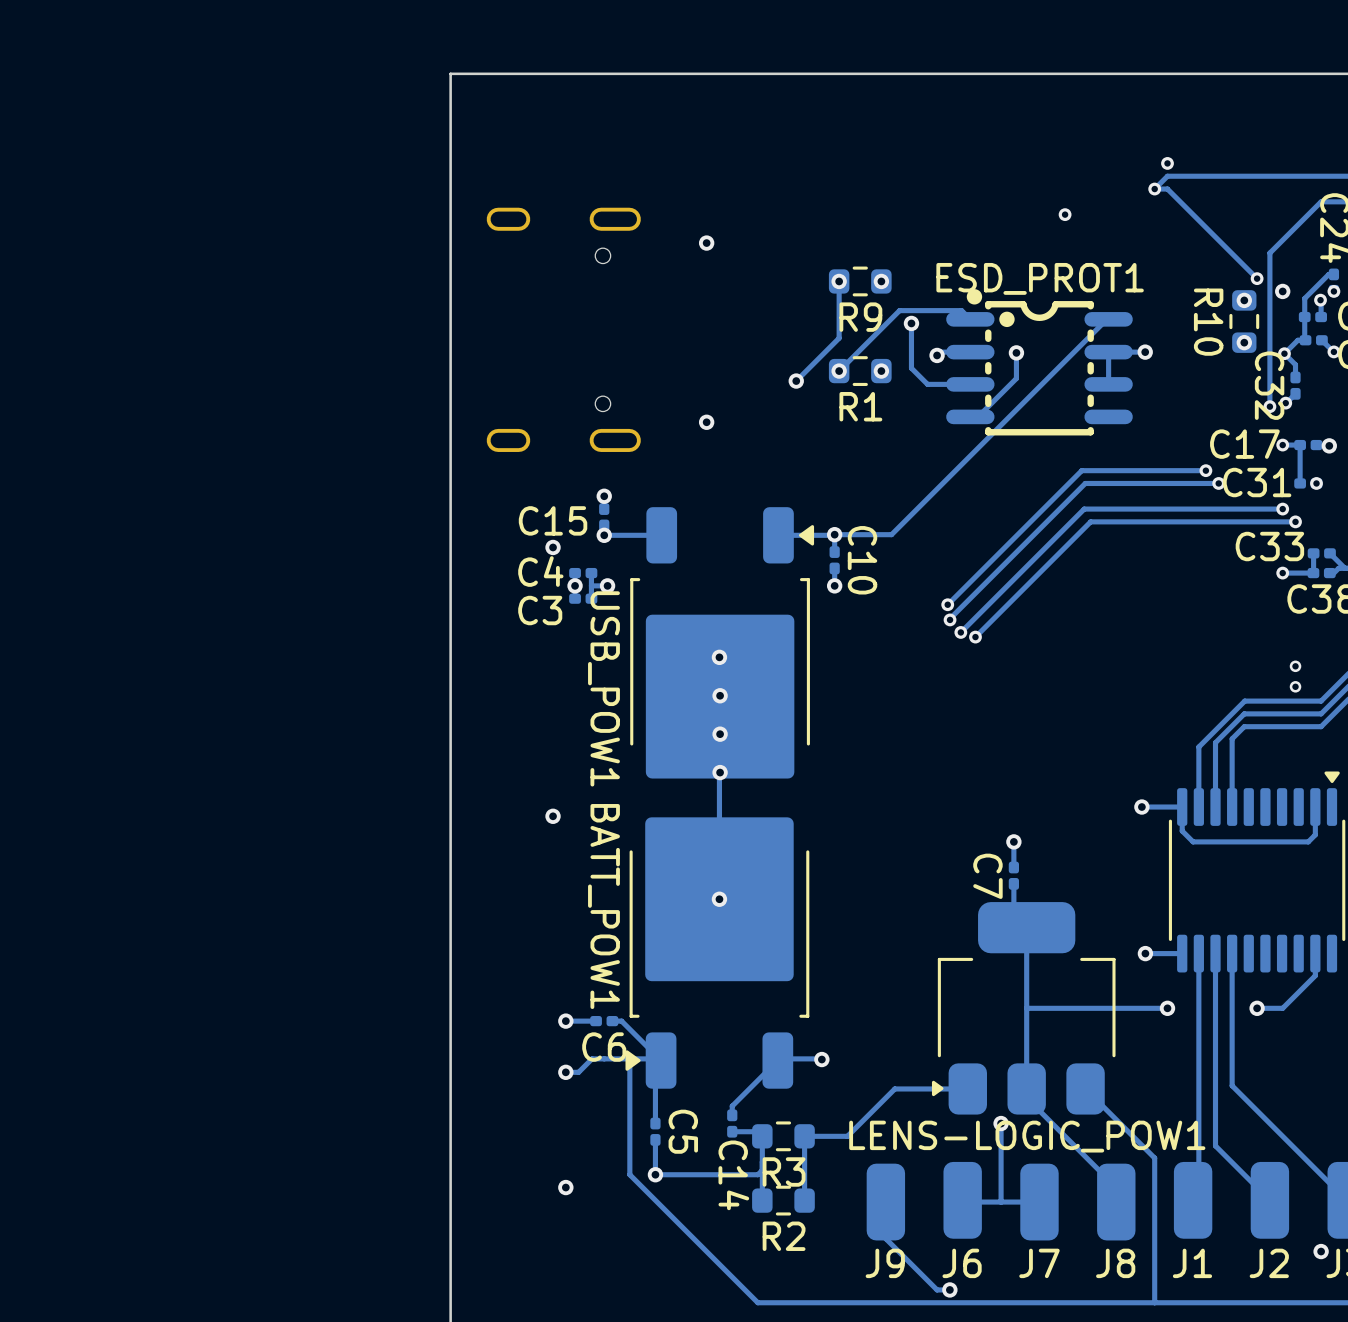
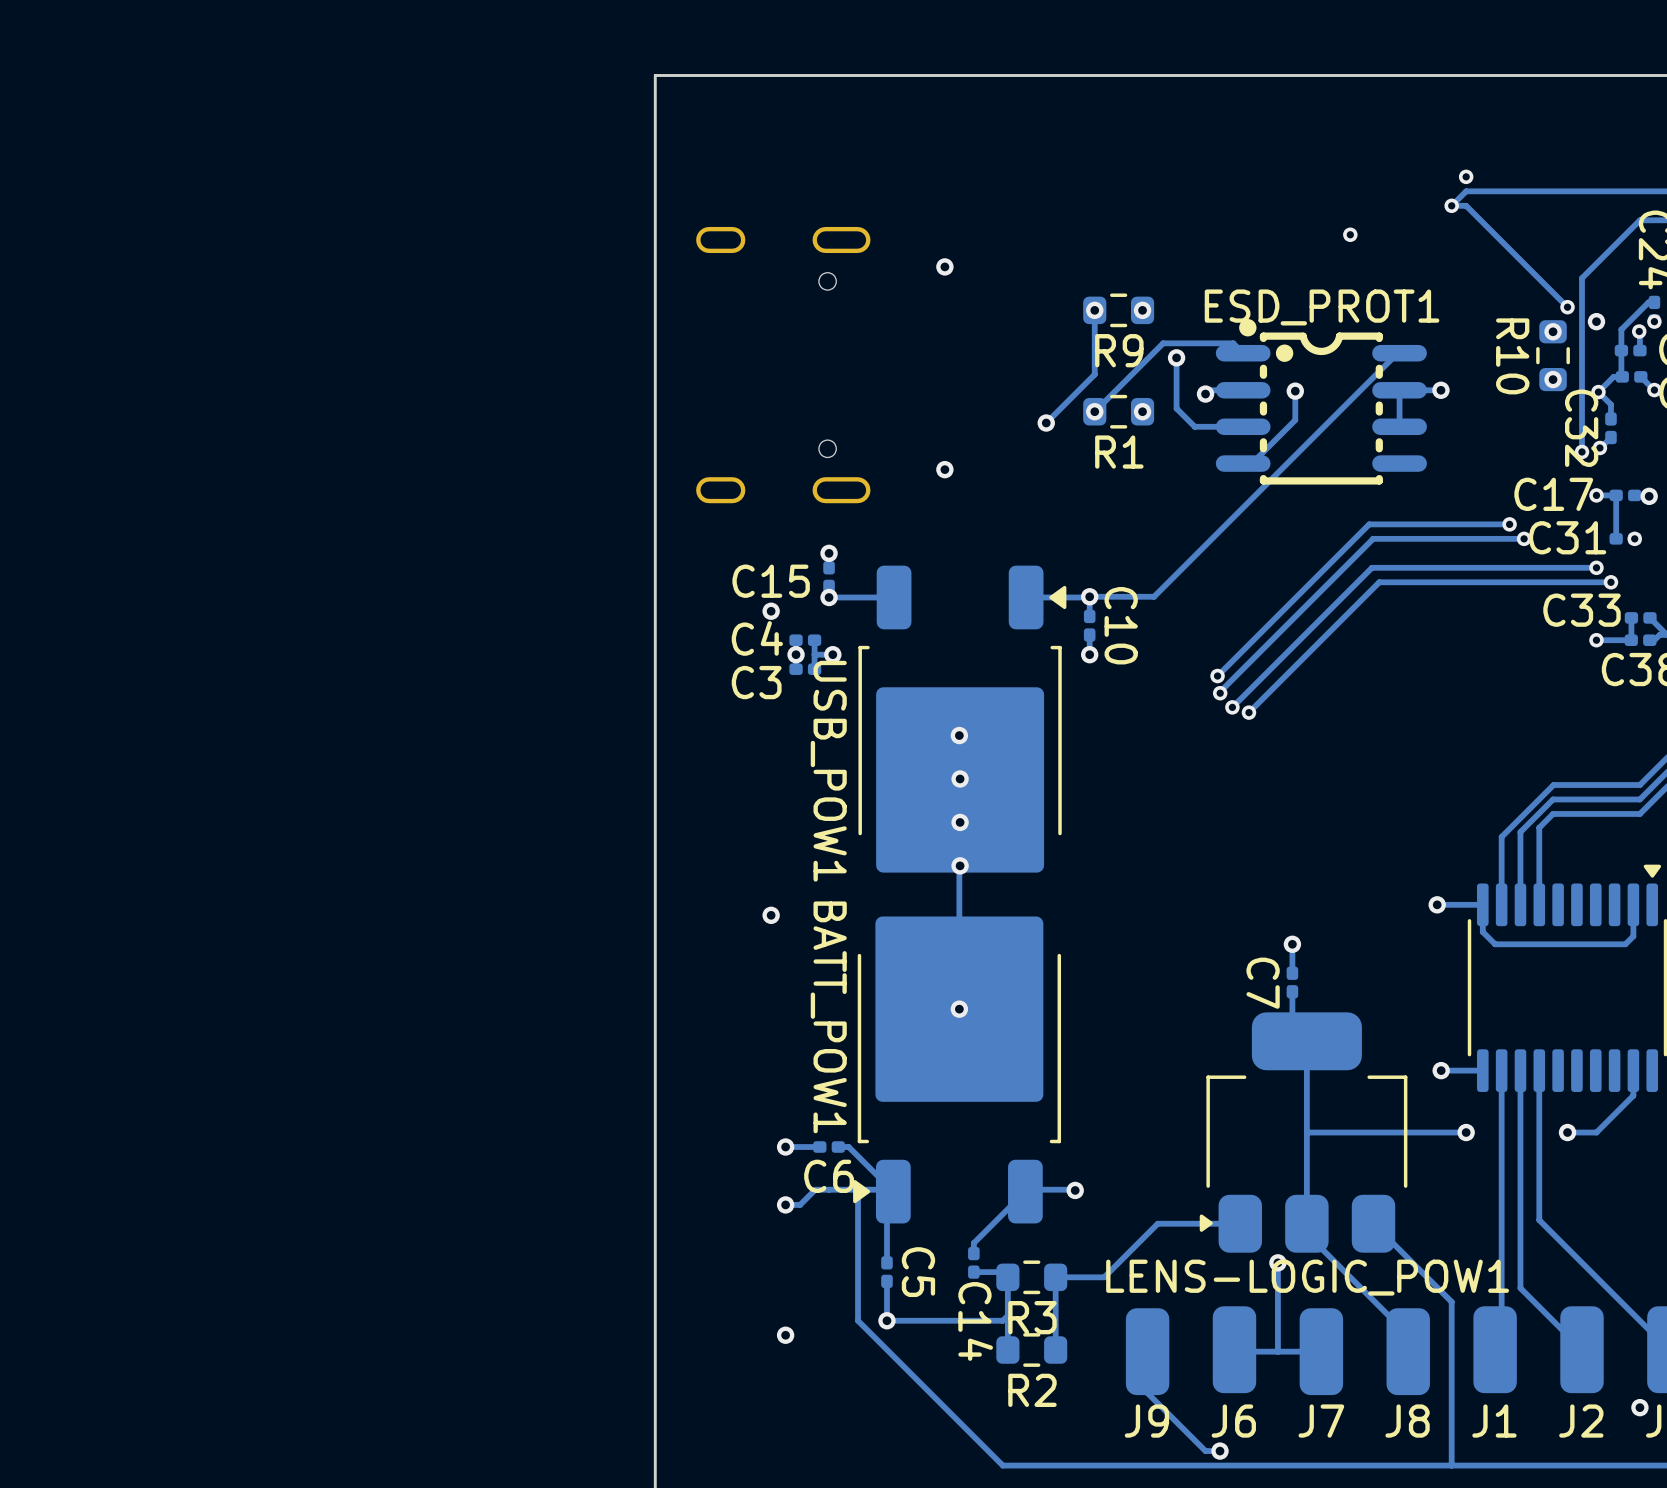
via: (1295, 666) -> none
via: (1295, 686) -> none

